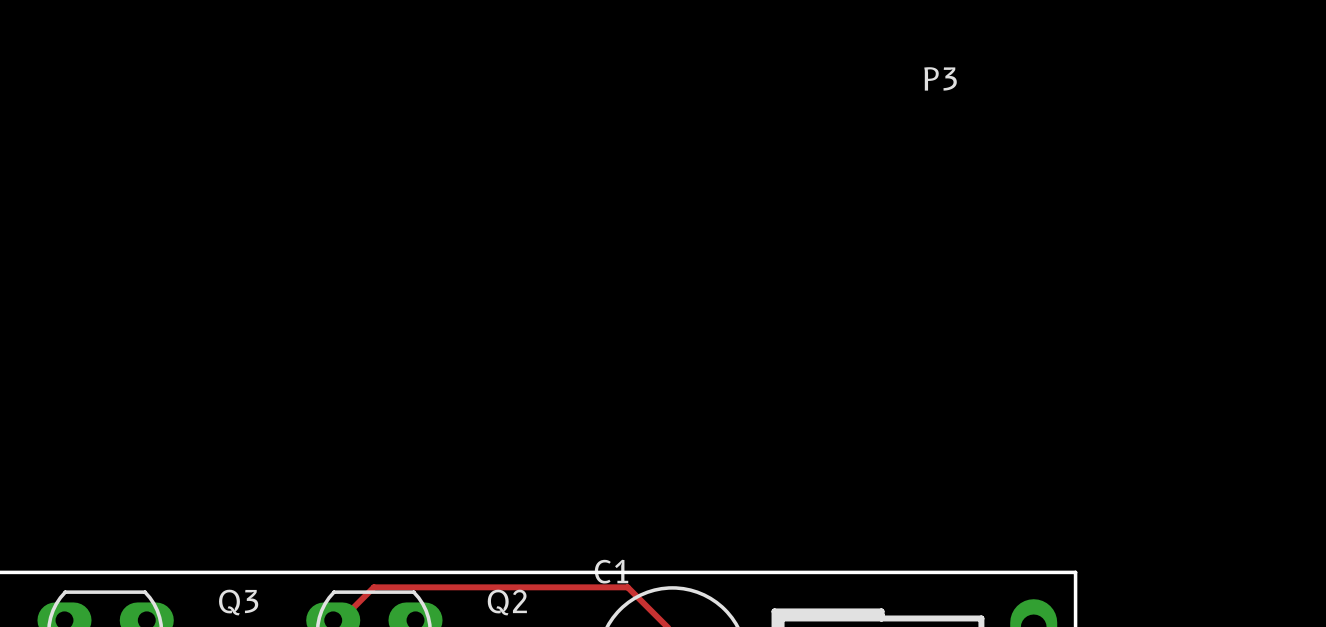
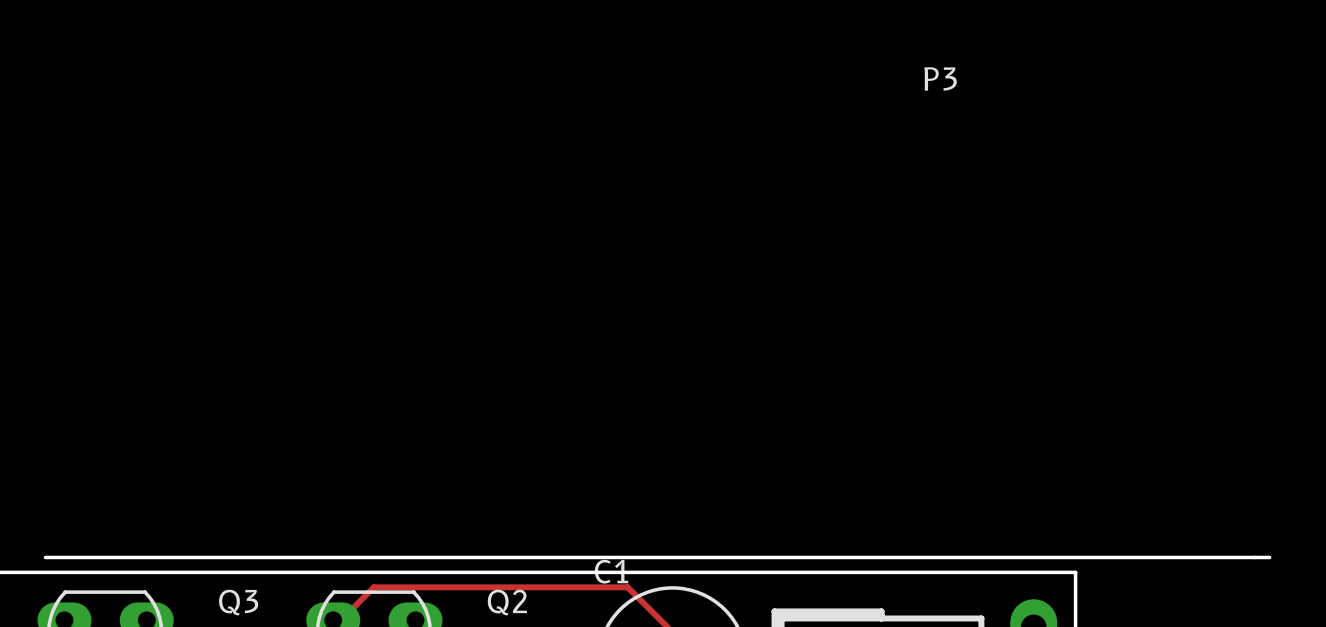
board edge: none -> (45, 557) (1269, 557)

